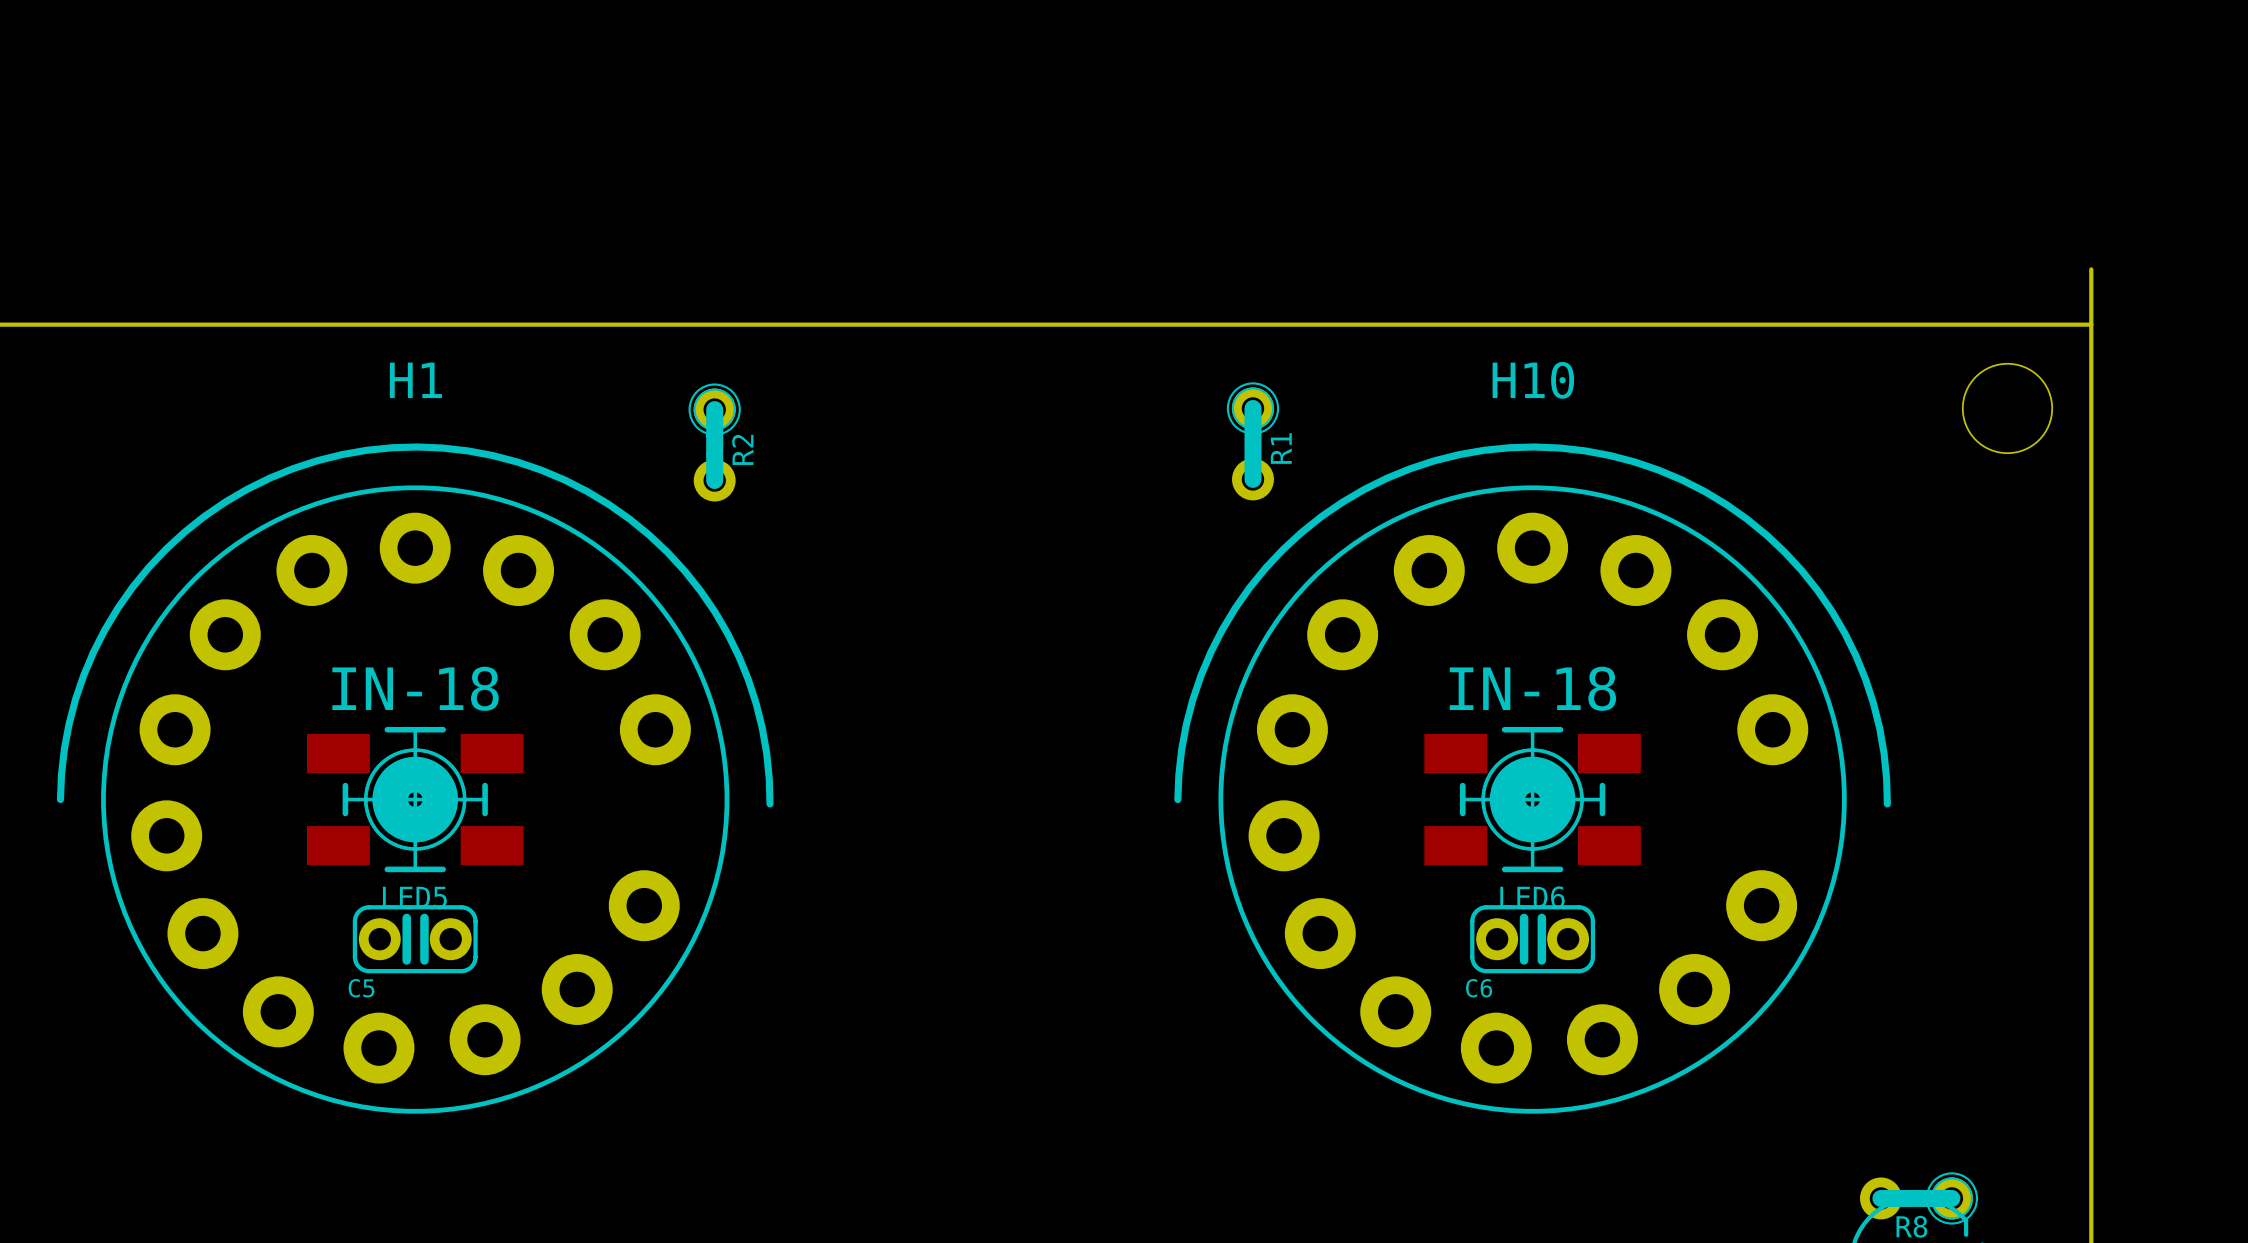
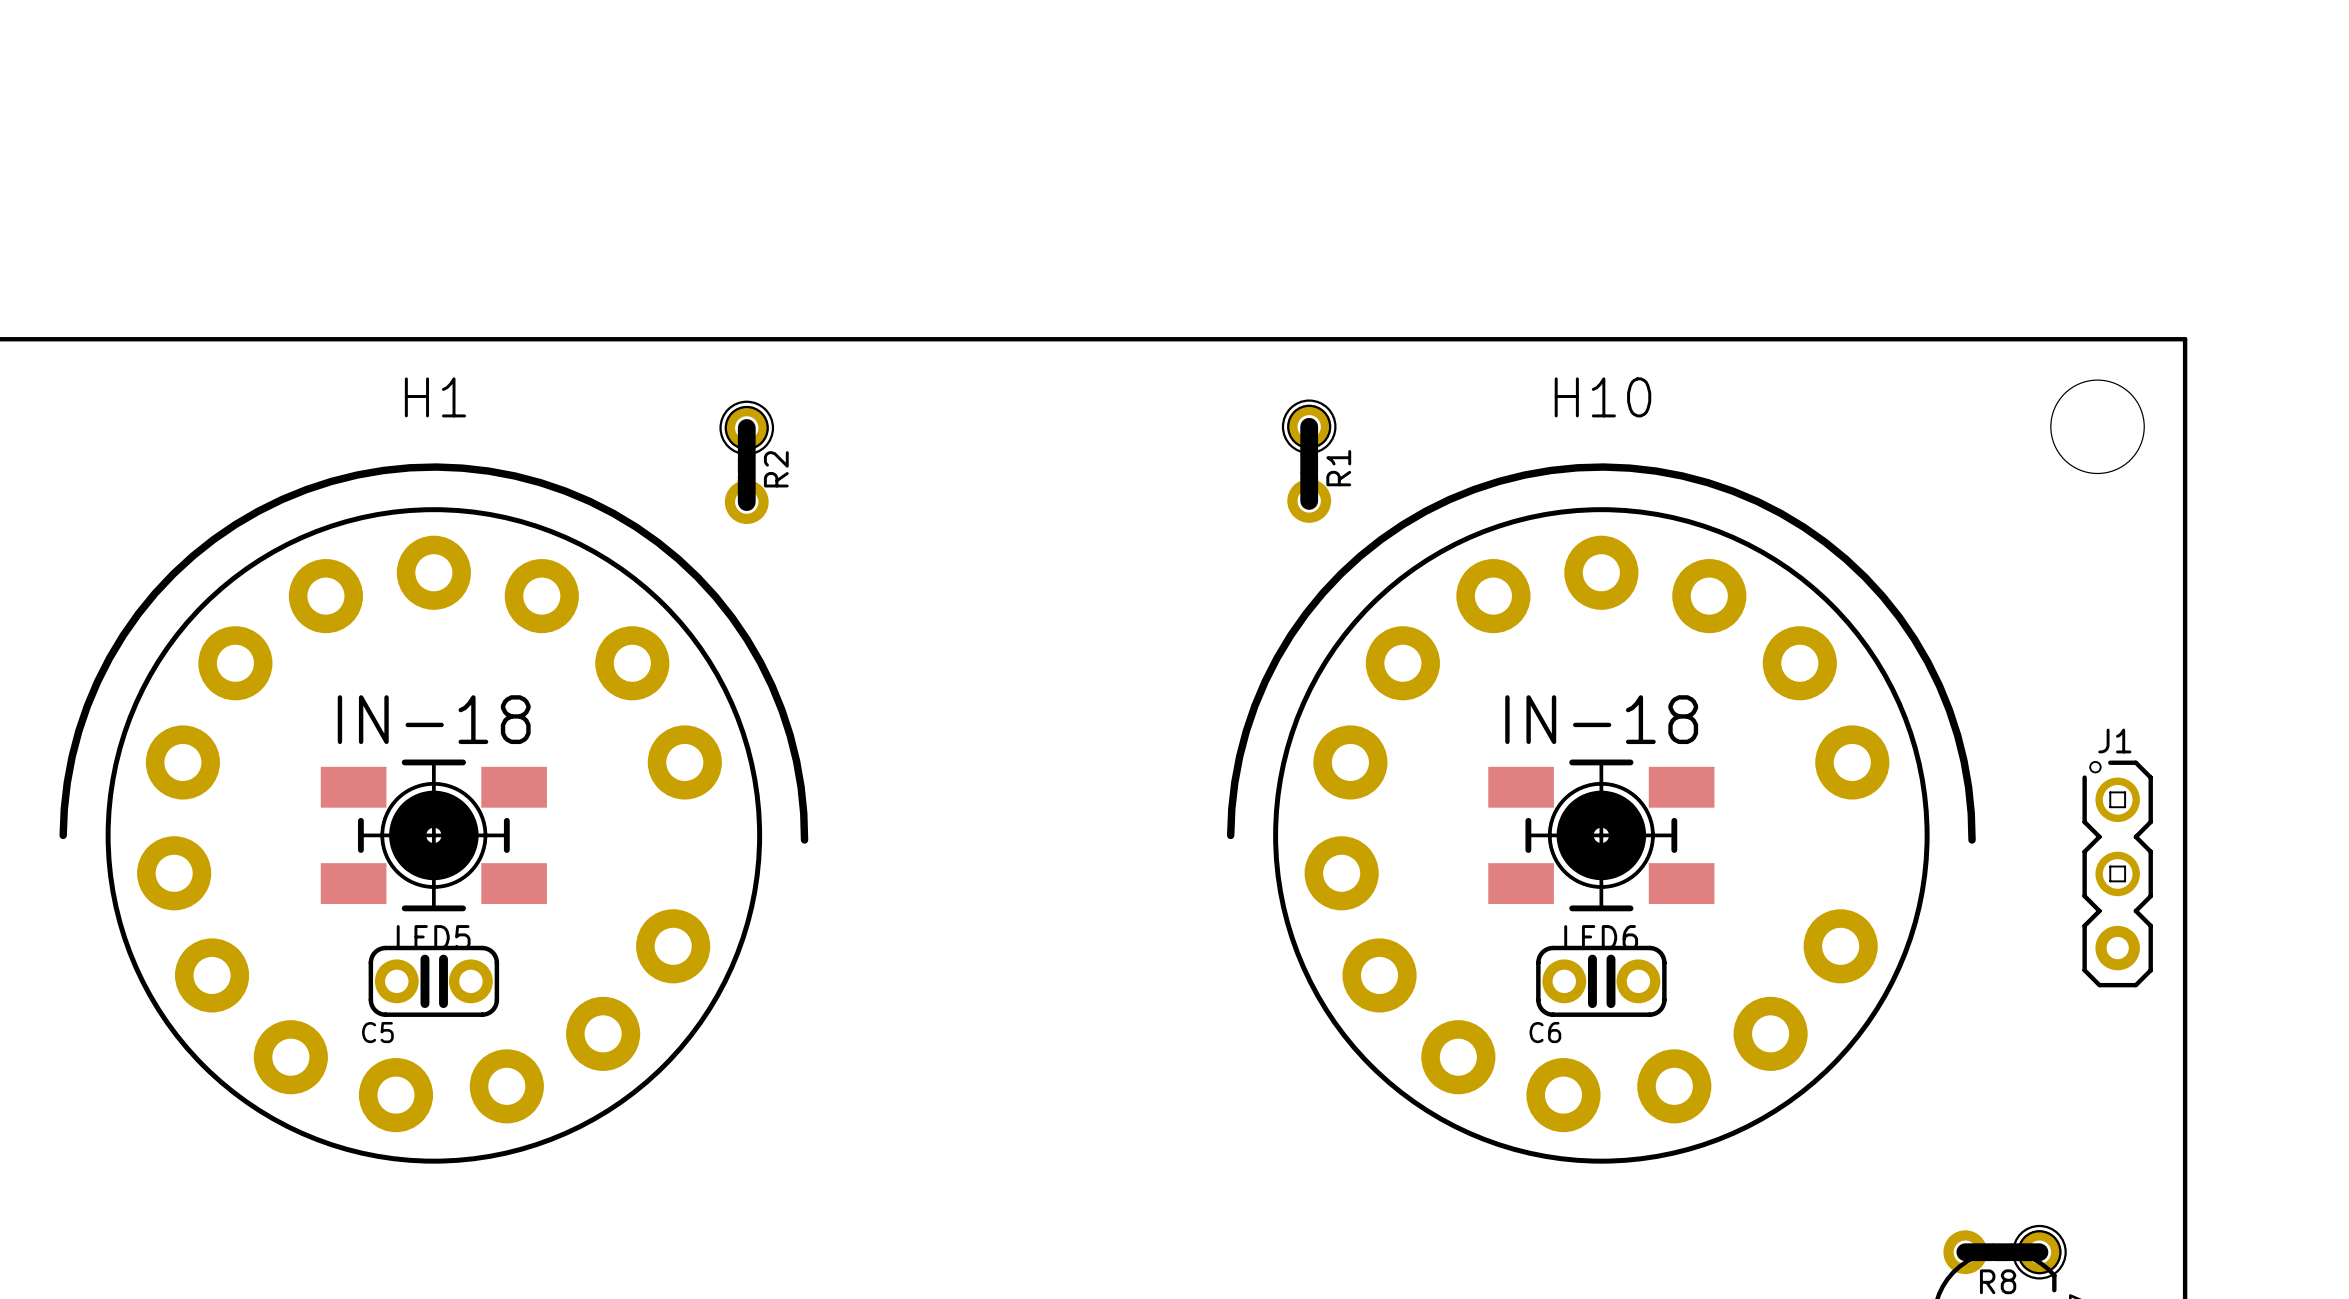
board edge: (2091, 269) (2091, 324) -> none
J1: none -> (2117, 873)

